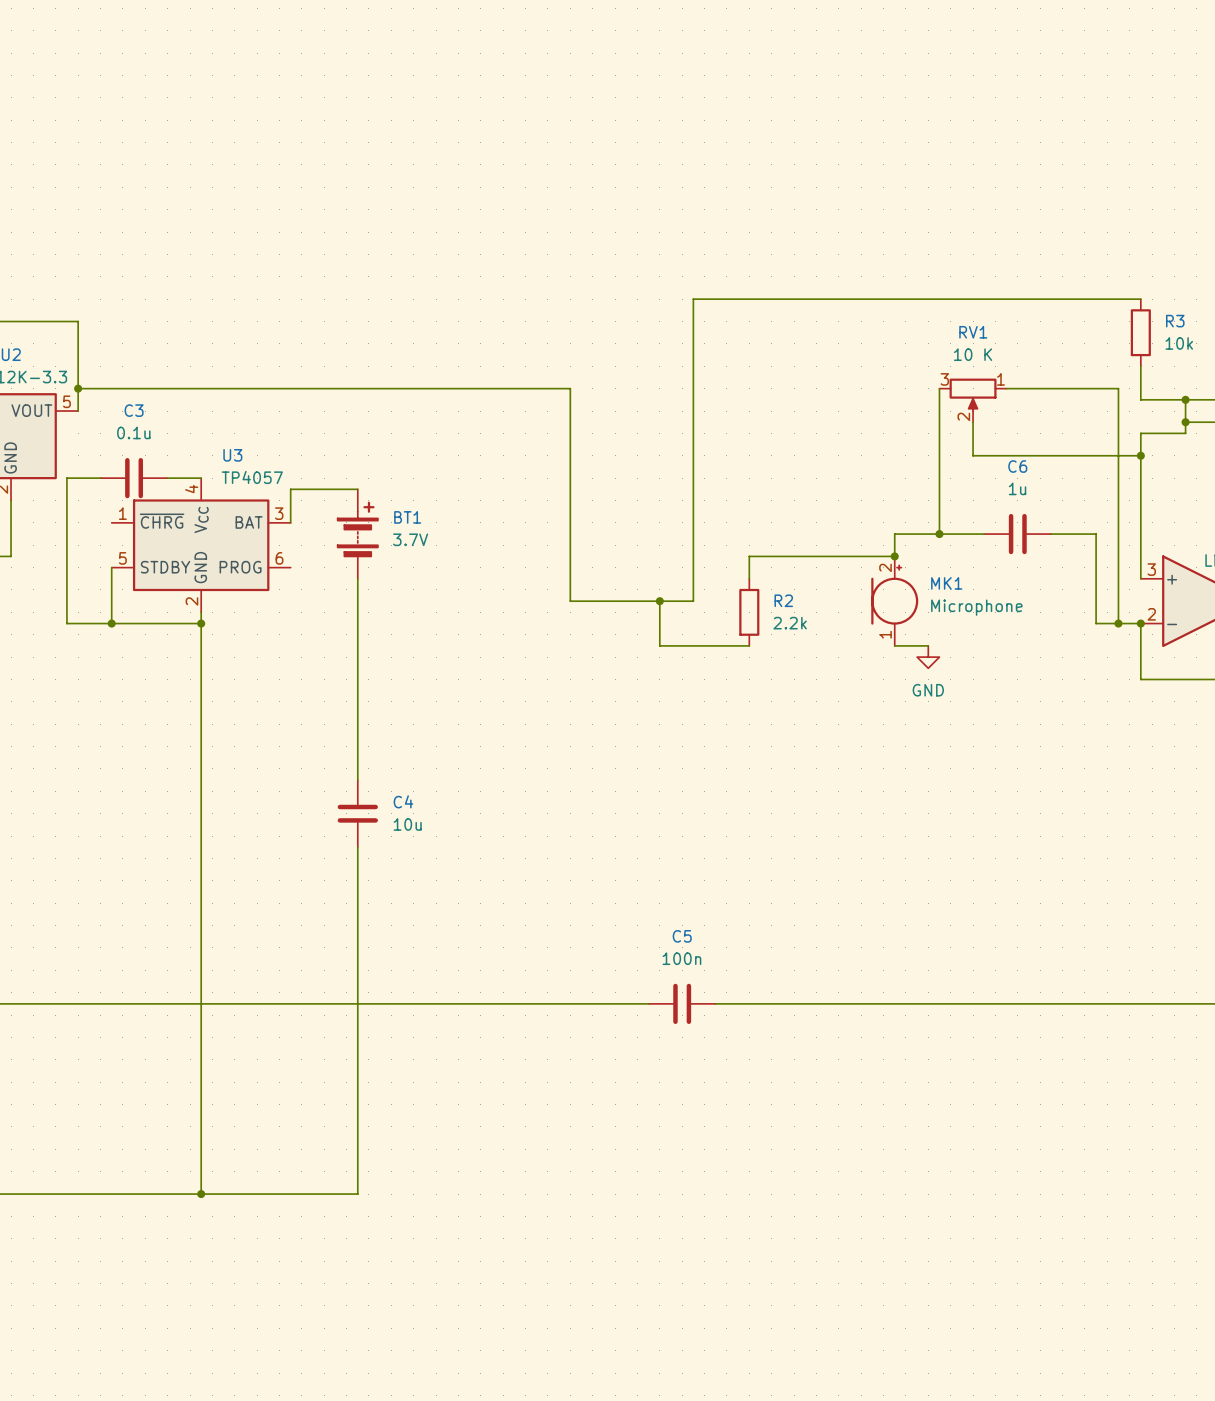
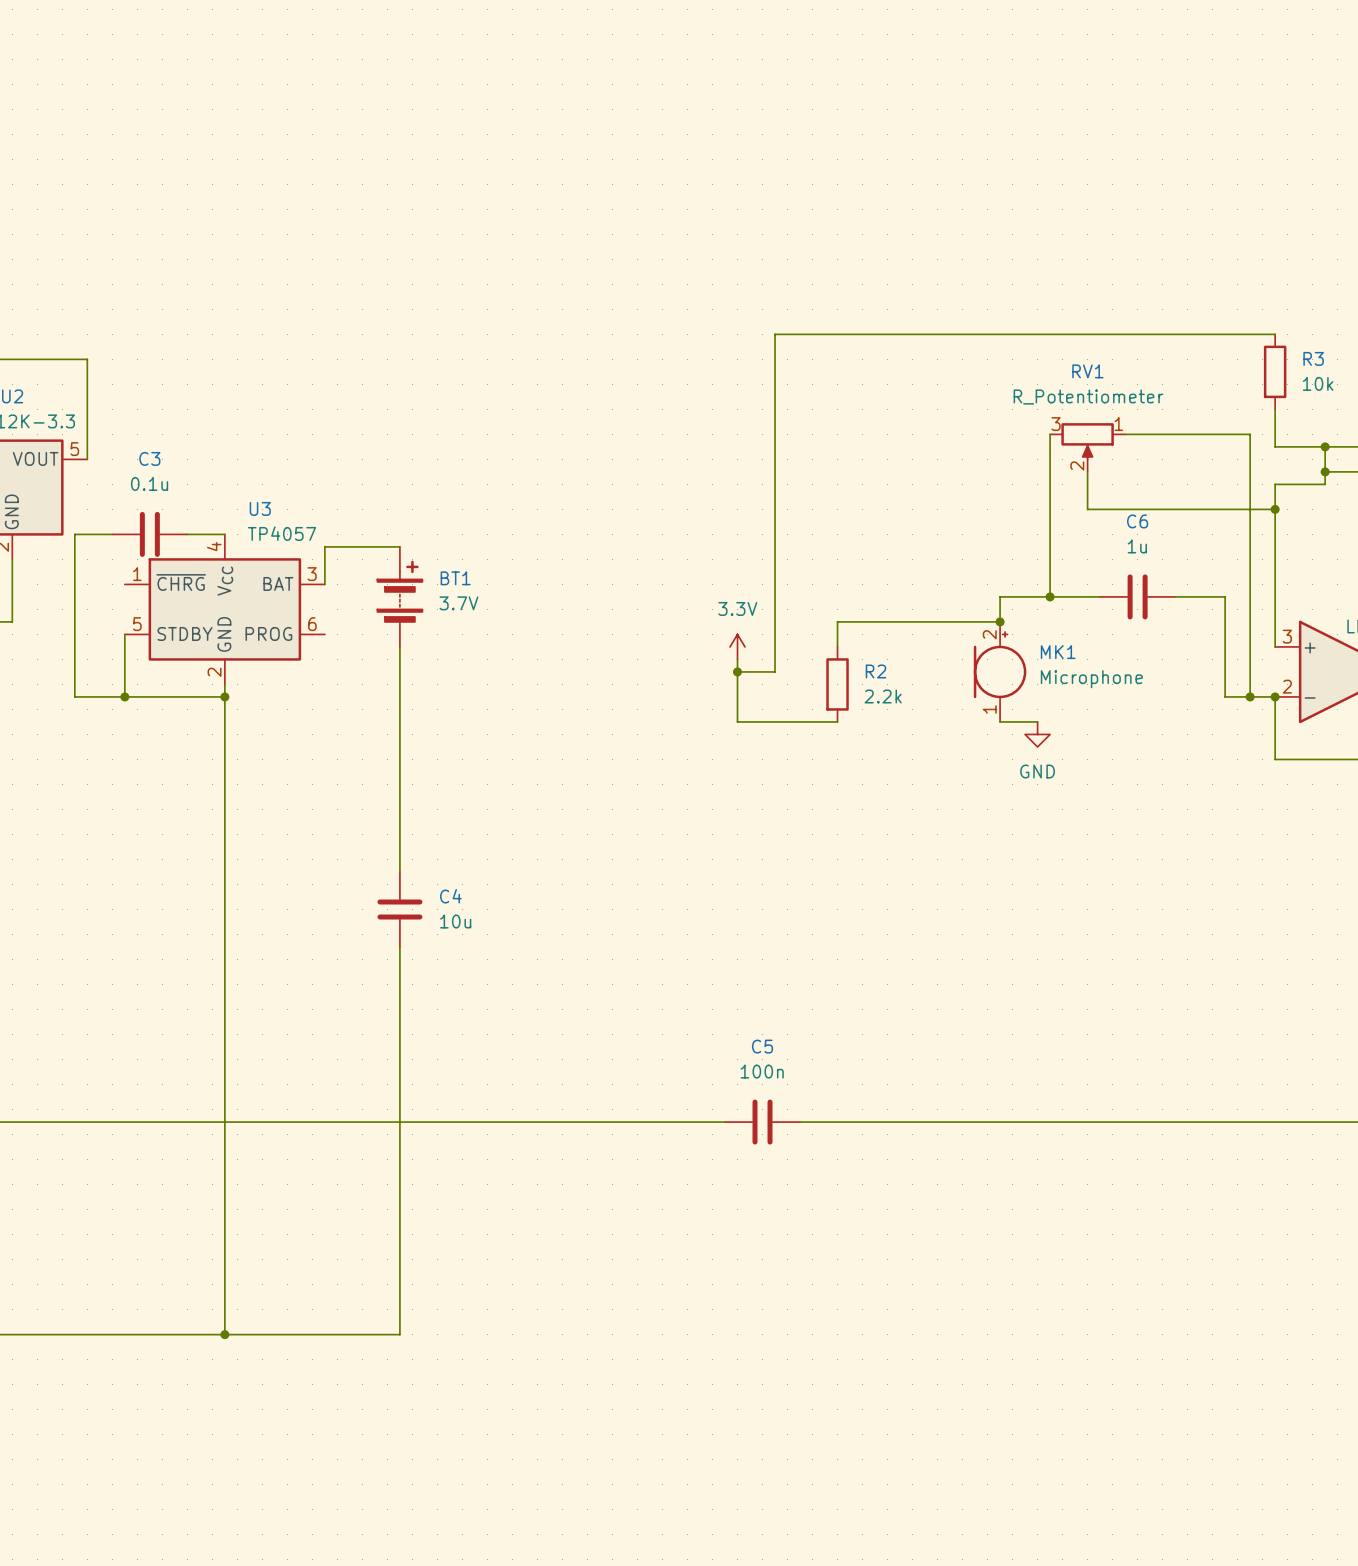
RV1 value: 10 K (973, 354) -> R_Potentiometer (1088, 397)
wire: (78, 388) (570, 388) (570, 601) (659, 601) -> (737, 659) (737, 671)
junction: (78, 388) -> none
power symbol: none -> 3.3V (737, 646)

